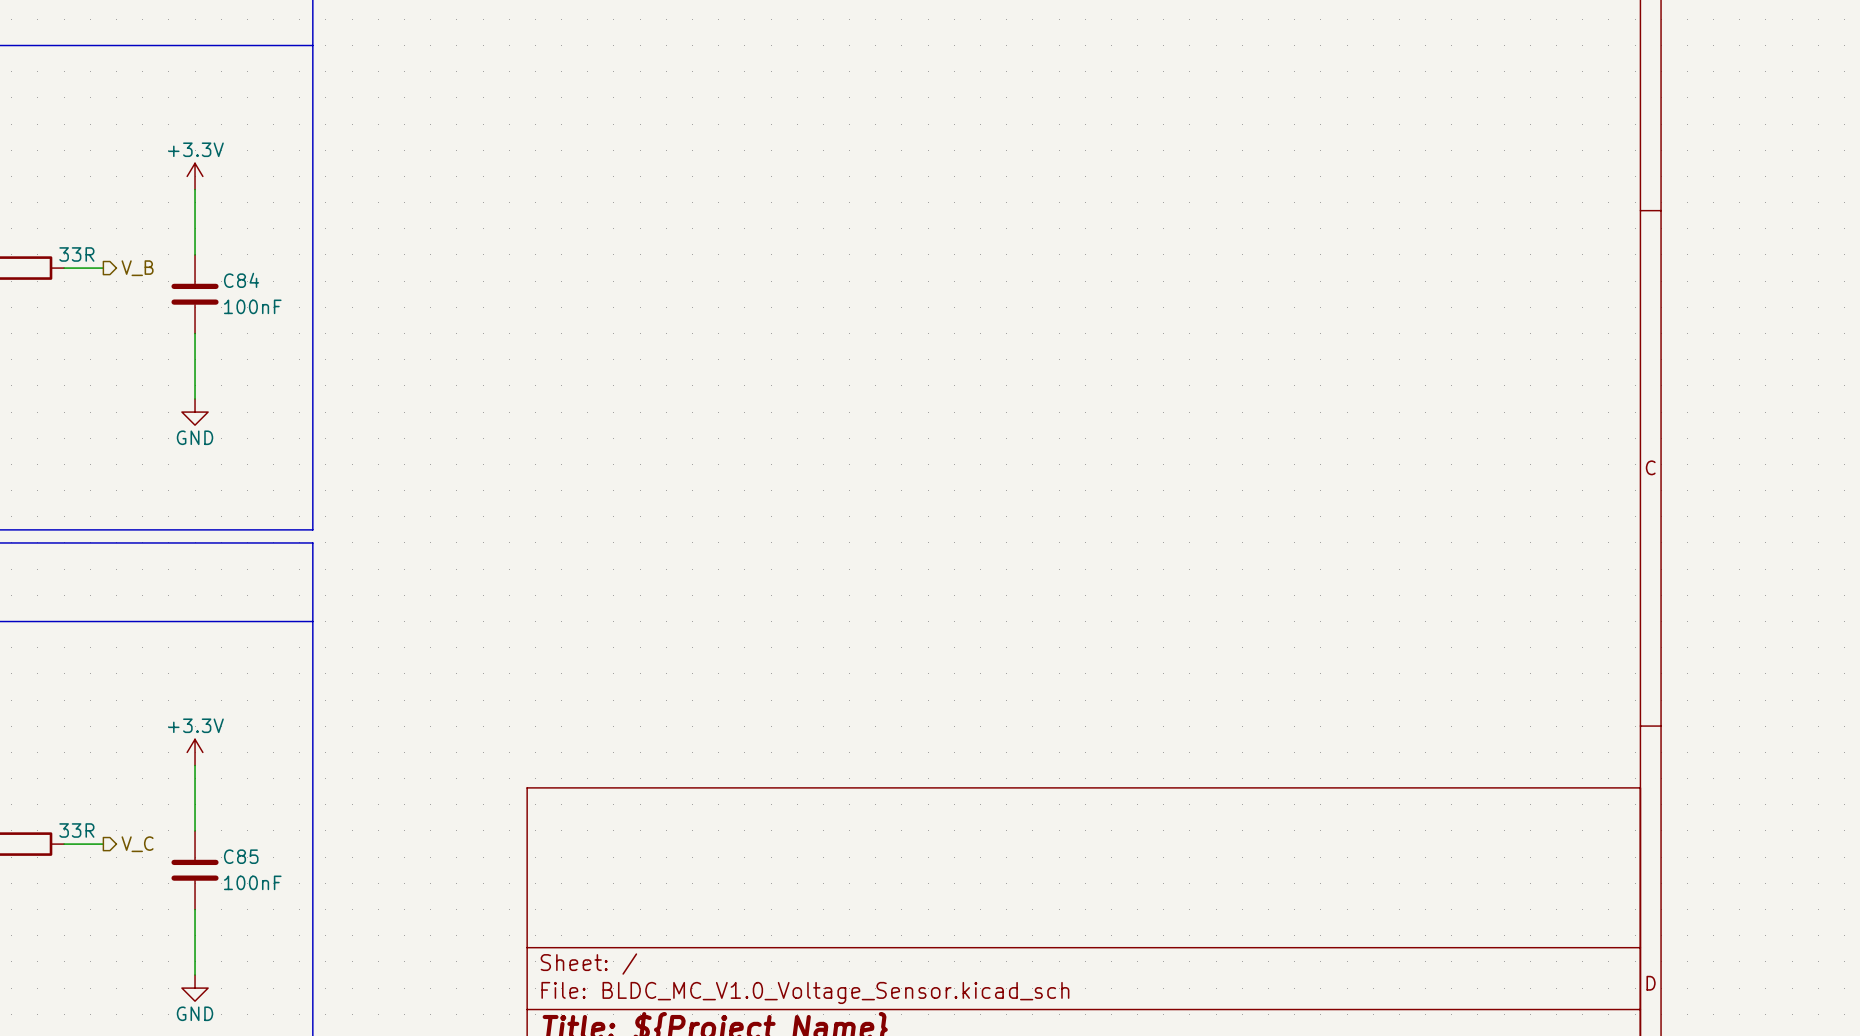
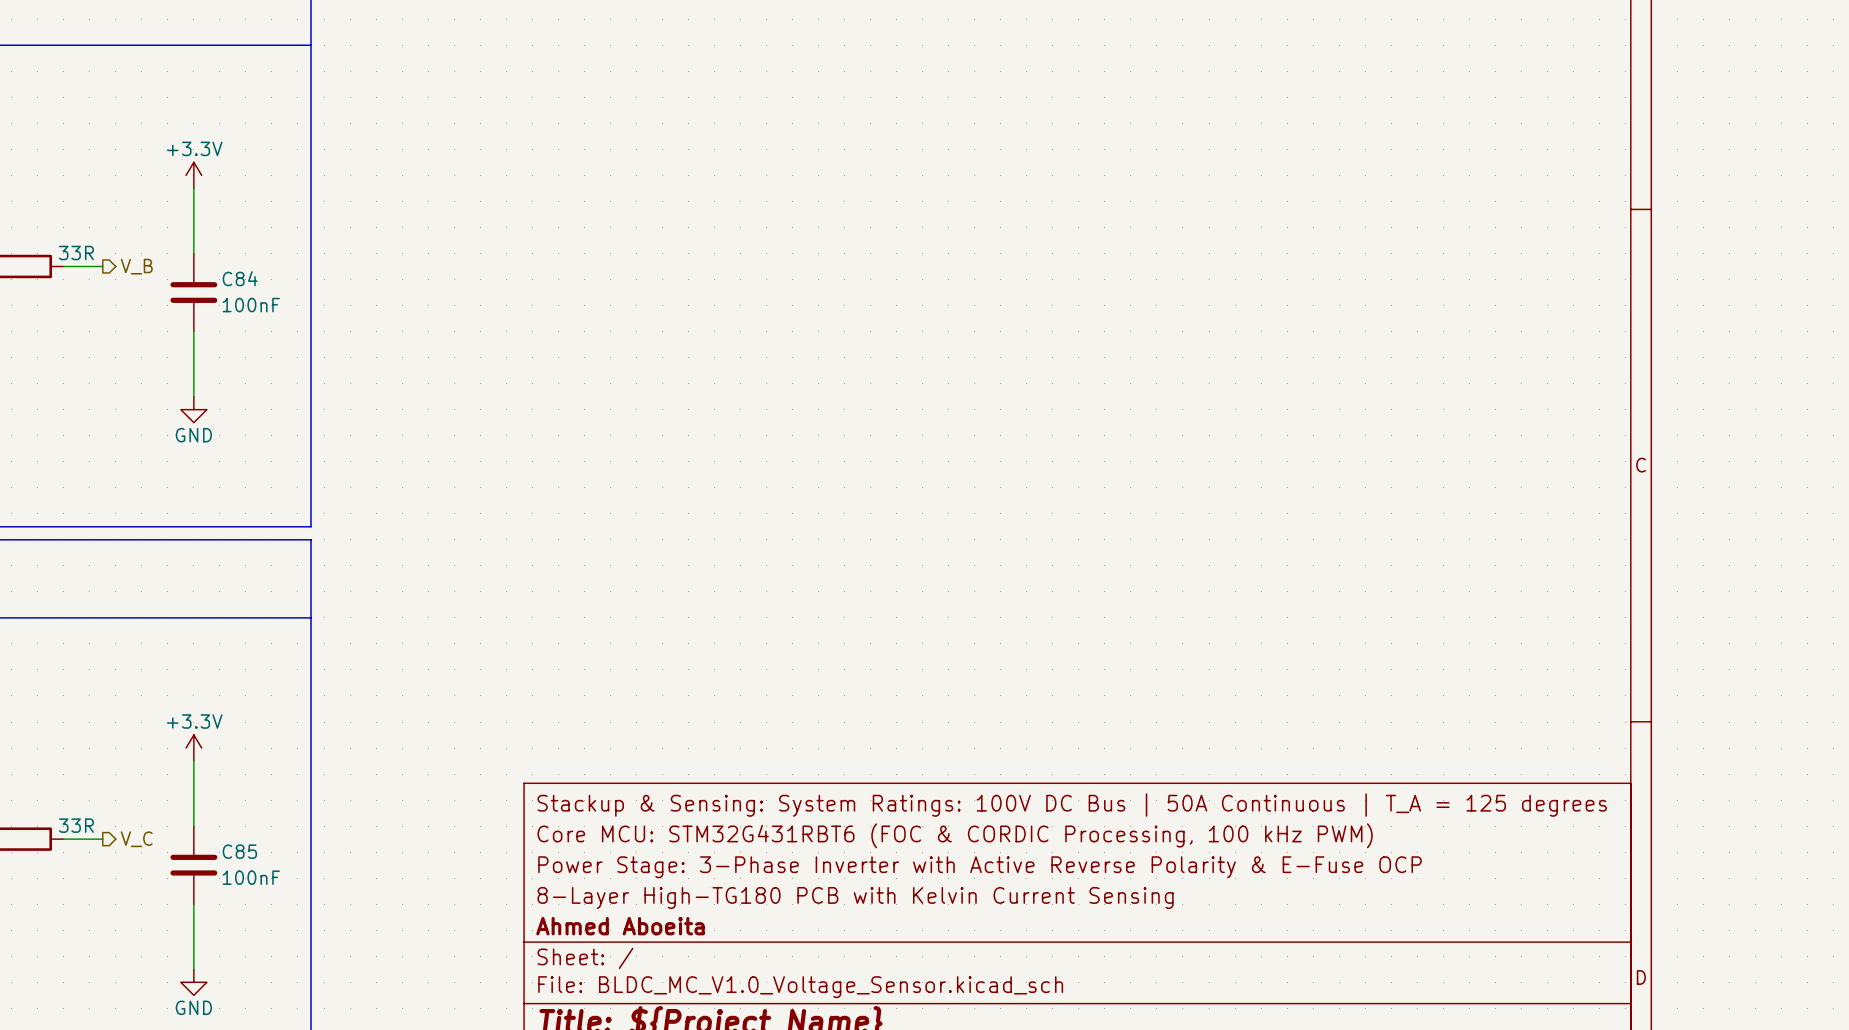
title block: none -> Stackup & Sensing: System Ratings: 100V DC Bus | 50A Continuous | T_A = 125 degrees (1072, 805)
title block: none -> Core MCU: STM32G431RBT6 (FOC & CORDIC Processing, 100 kHz PWM) (955, 835)
title block: none -> Power Stage: 3-Phase Inverter with Active Reverse Polarity & E-Fuse OCP (980, 867)
title block: none -> 8-Layer High-TG180 PCB with Kelvin Current Sensing (855, 898)
title block: none -> Ahmed Aboeita (620, 926)

